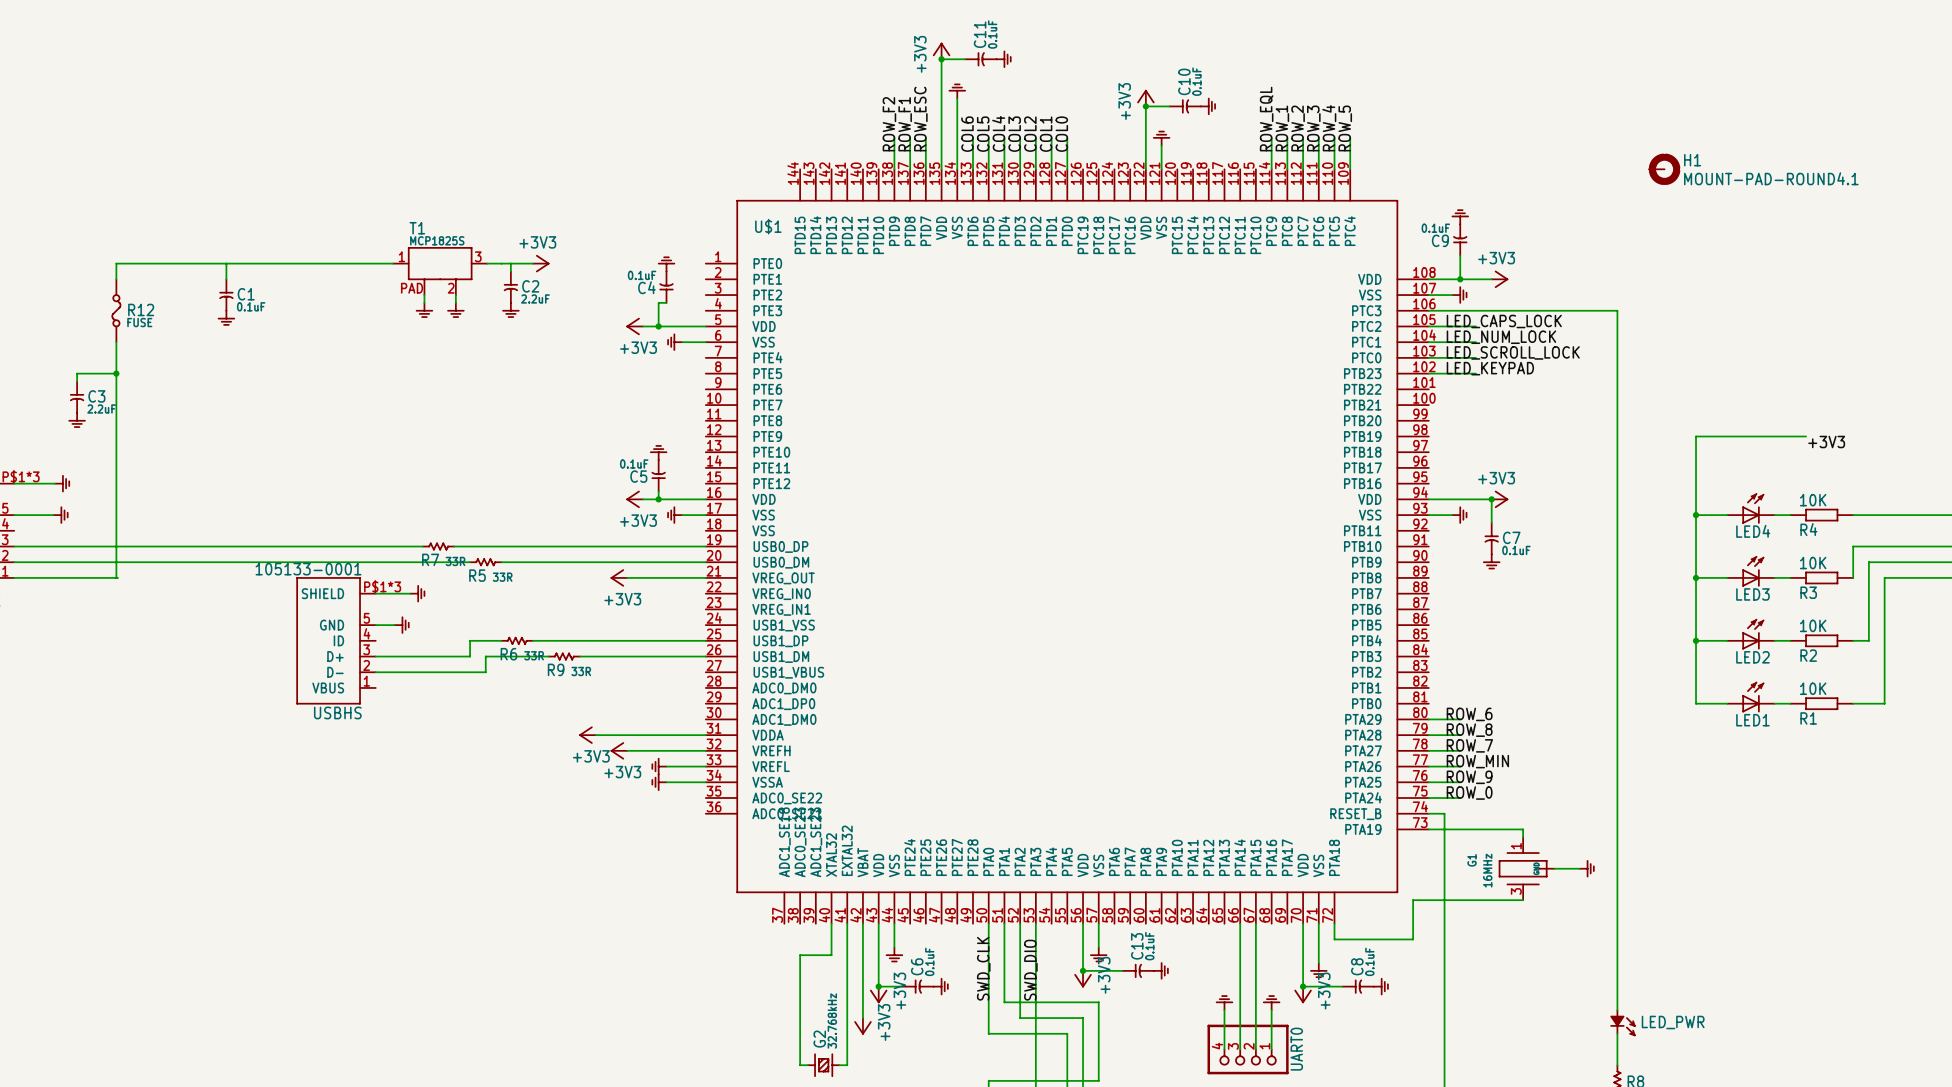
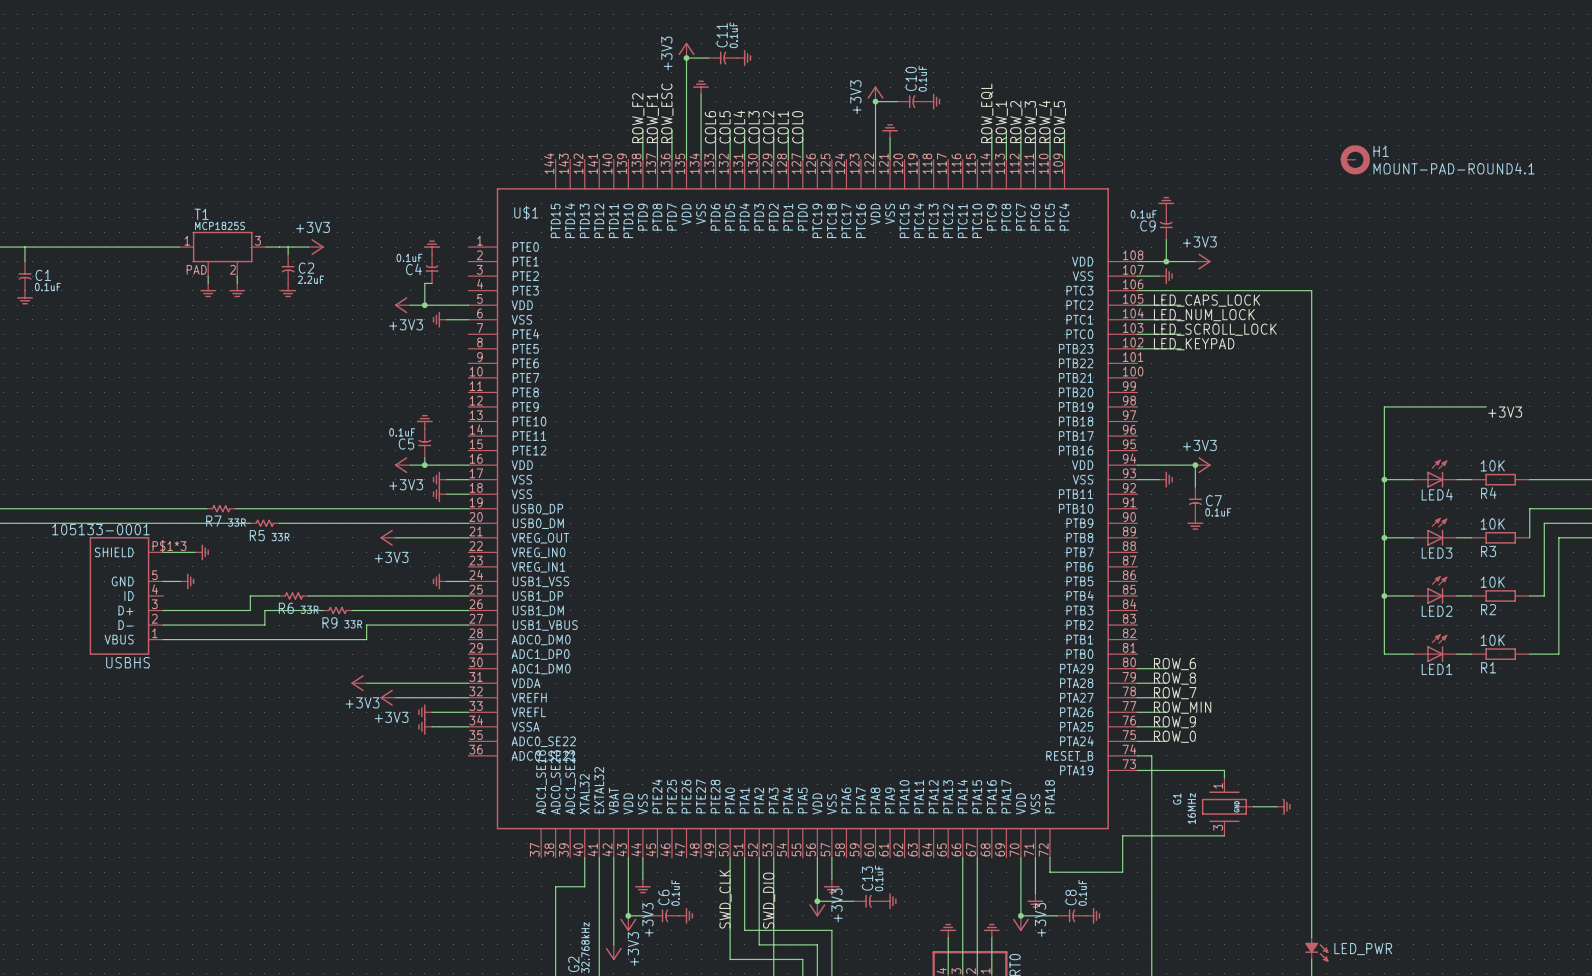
power symbol: none -> (439, 494)
wire: none -> (446, 494) (468, 494)
power symbol: none -> (439, 581)
wire: none -> (446, 581) (468, 581)
wire: none -> (468, 625) (366, 625) (366, 639) (163, 639)

